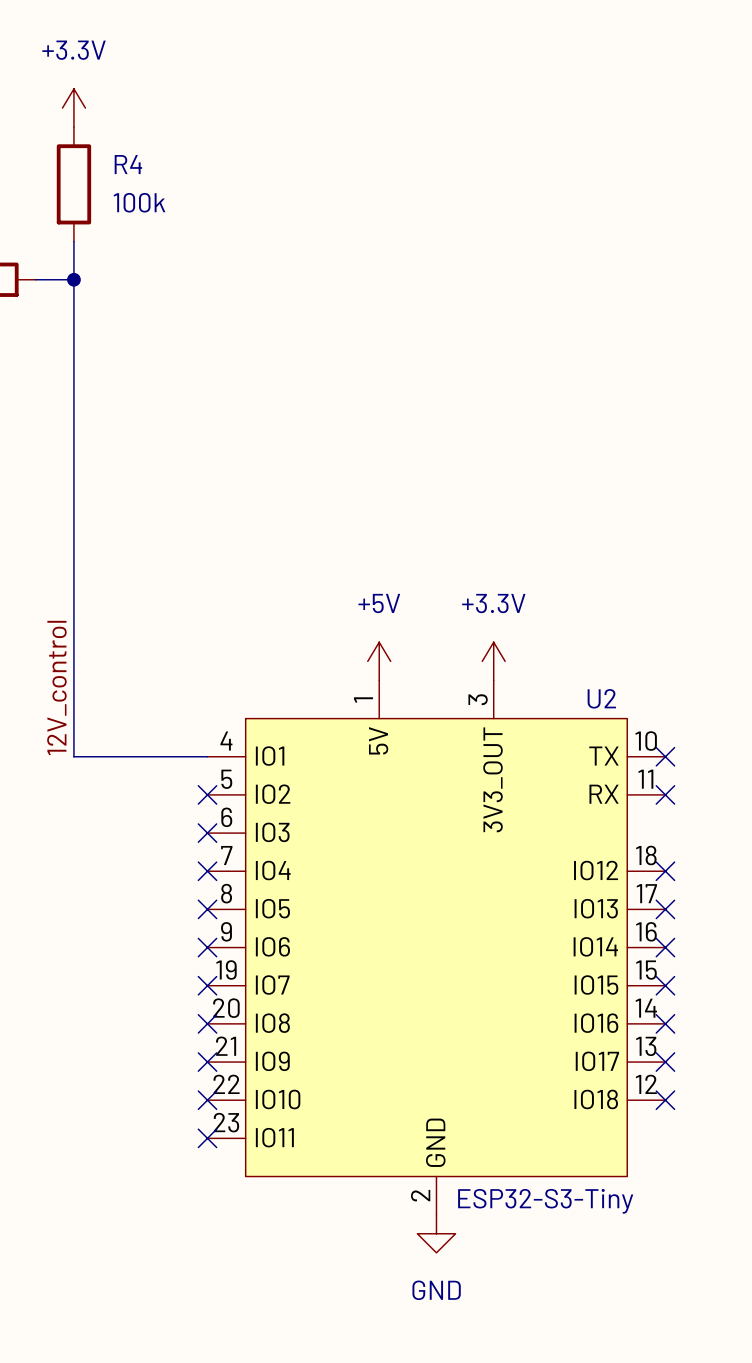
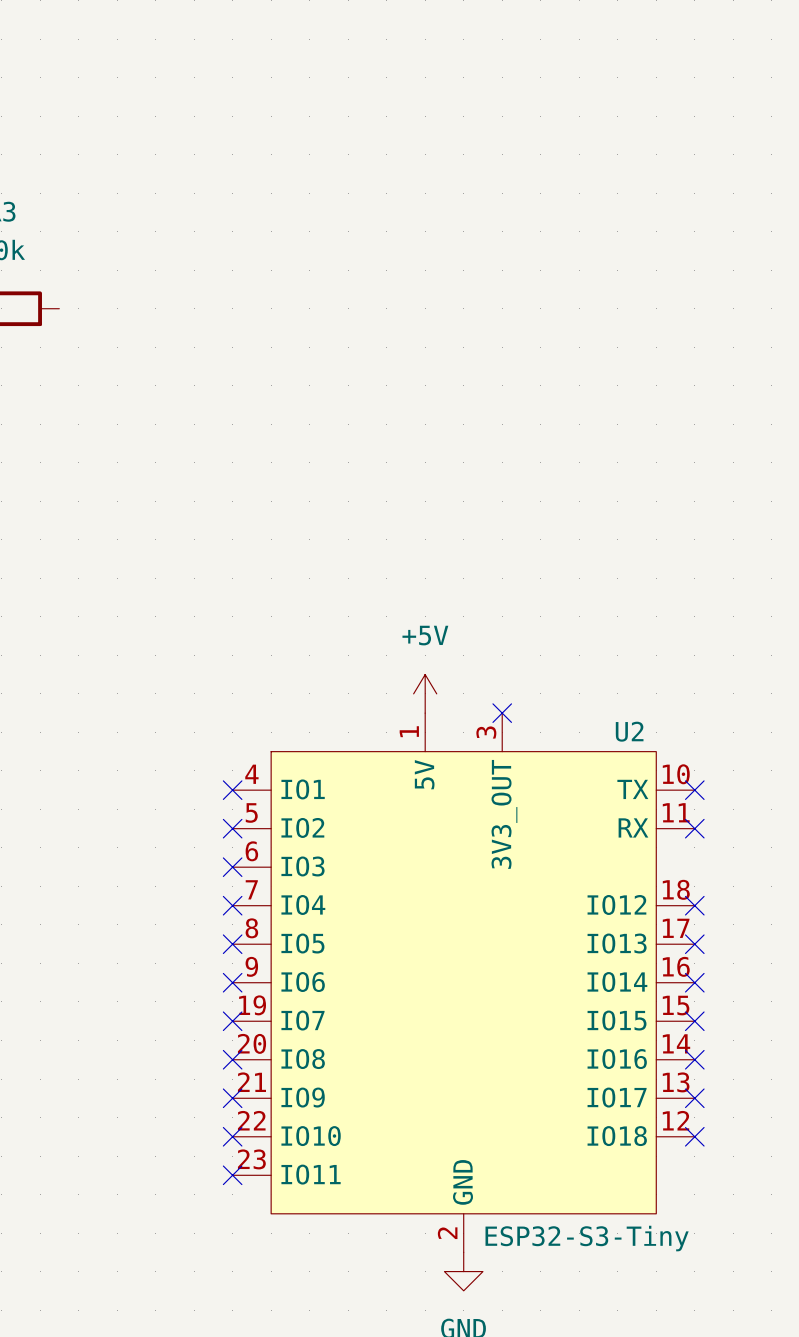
power symbol: +3.3V (73, 108) -> none
R4: 100k (73, 184) -> none
wire: (73, 241) (73, 756) (207, 756) -> none
wire: (35, 279) (73, 279) -> none
junction: (73, 279) -> none
power symbol position: +5V (379, 661) -> +5V (425, 693)
power symbol: +3.3V (493, 661) -> none
U2 symbol: [207, 680, 666, 1215] -> [232, 713, 695, 1253]
no-connect mark: none -> (502, 713)
label: 12V_control (56, 688) -> none
no-connect mark: none -> (232, 790)

